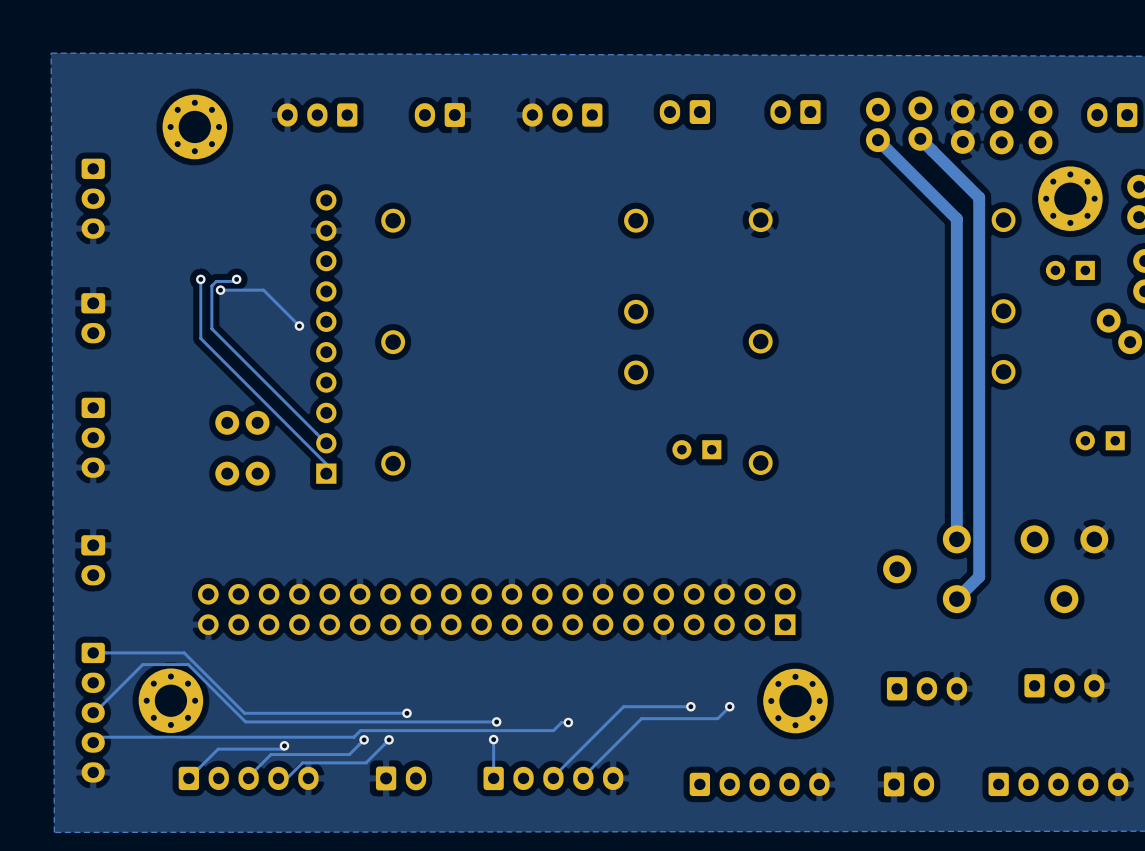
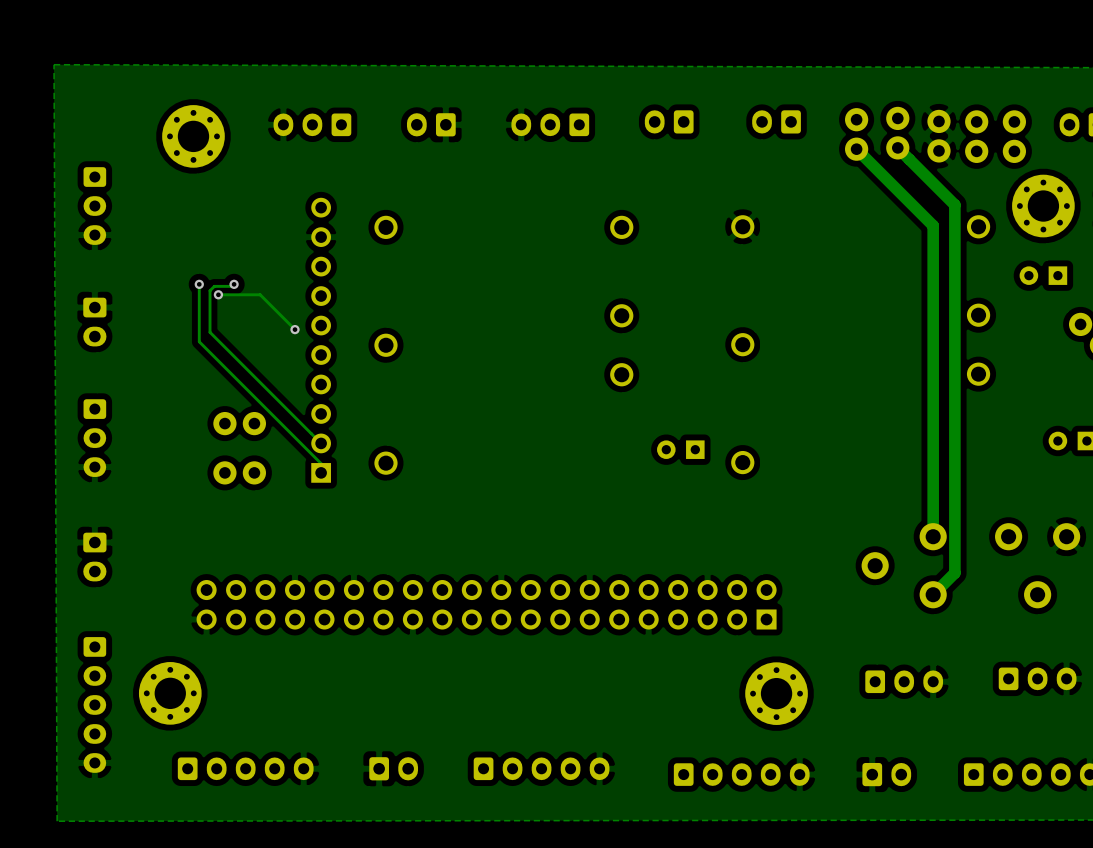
track: (93, 652) (184, 652) (244, 713) (407, 713) -> none
track: (690, 706) (623, 706) (553, 778) -> none
via: (690, 706) -> none
track: (729, 706) (717, 718) (641, 718) (583, 778) -> none
via: (729, 706) -> none
track: (93, 712) (142, 664) (188, 664) (245, 721) (496, 721) -> none
via: (407, 713) -> none
via: (496, 721) -> none
track: (568, 722) (561, 722) (553, 730) (360, 730) (353, 737) (100, 737) (93, 742) -> none
via: (568, 722) -> none
track: (364, 739) (349, 754) (271, 754) (248, 778) -> none
via: (364, 739) -> none
track: (389, 739) (366, 762) (302, 762) (287, 778) (278, 778) -> none
via: (389, 739) -> none
track: (493, 739) (493, 778) -> none
via: (493, 739) -> none
track: (284, 745) (283, 749) (218, 749) (188, 778) -> none
via: (284, 745) -> none

